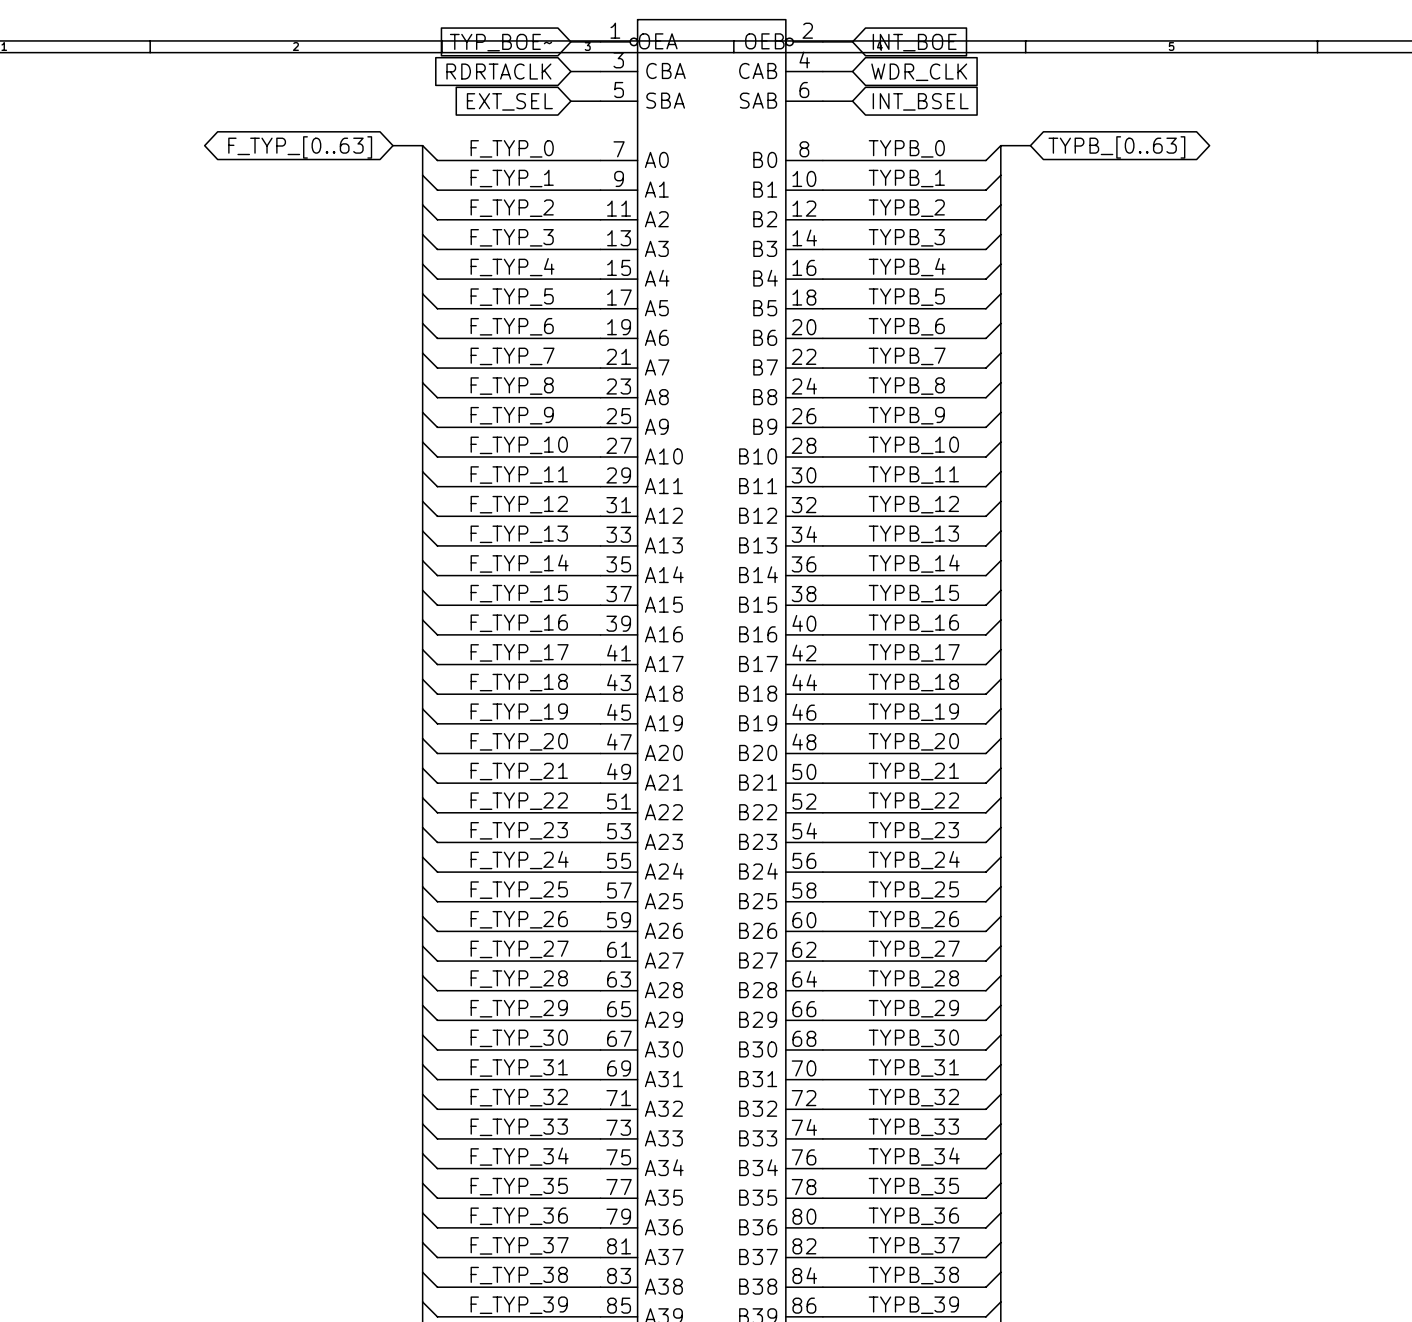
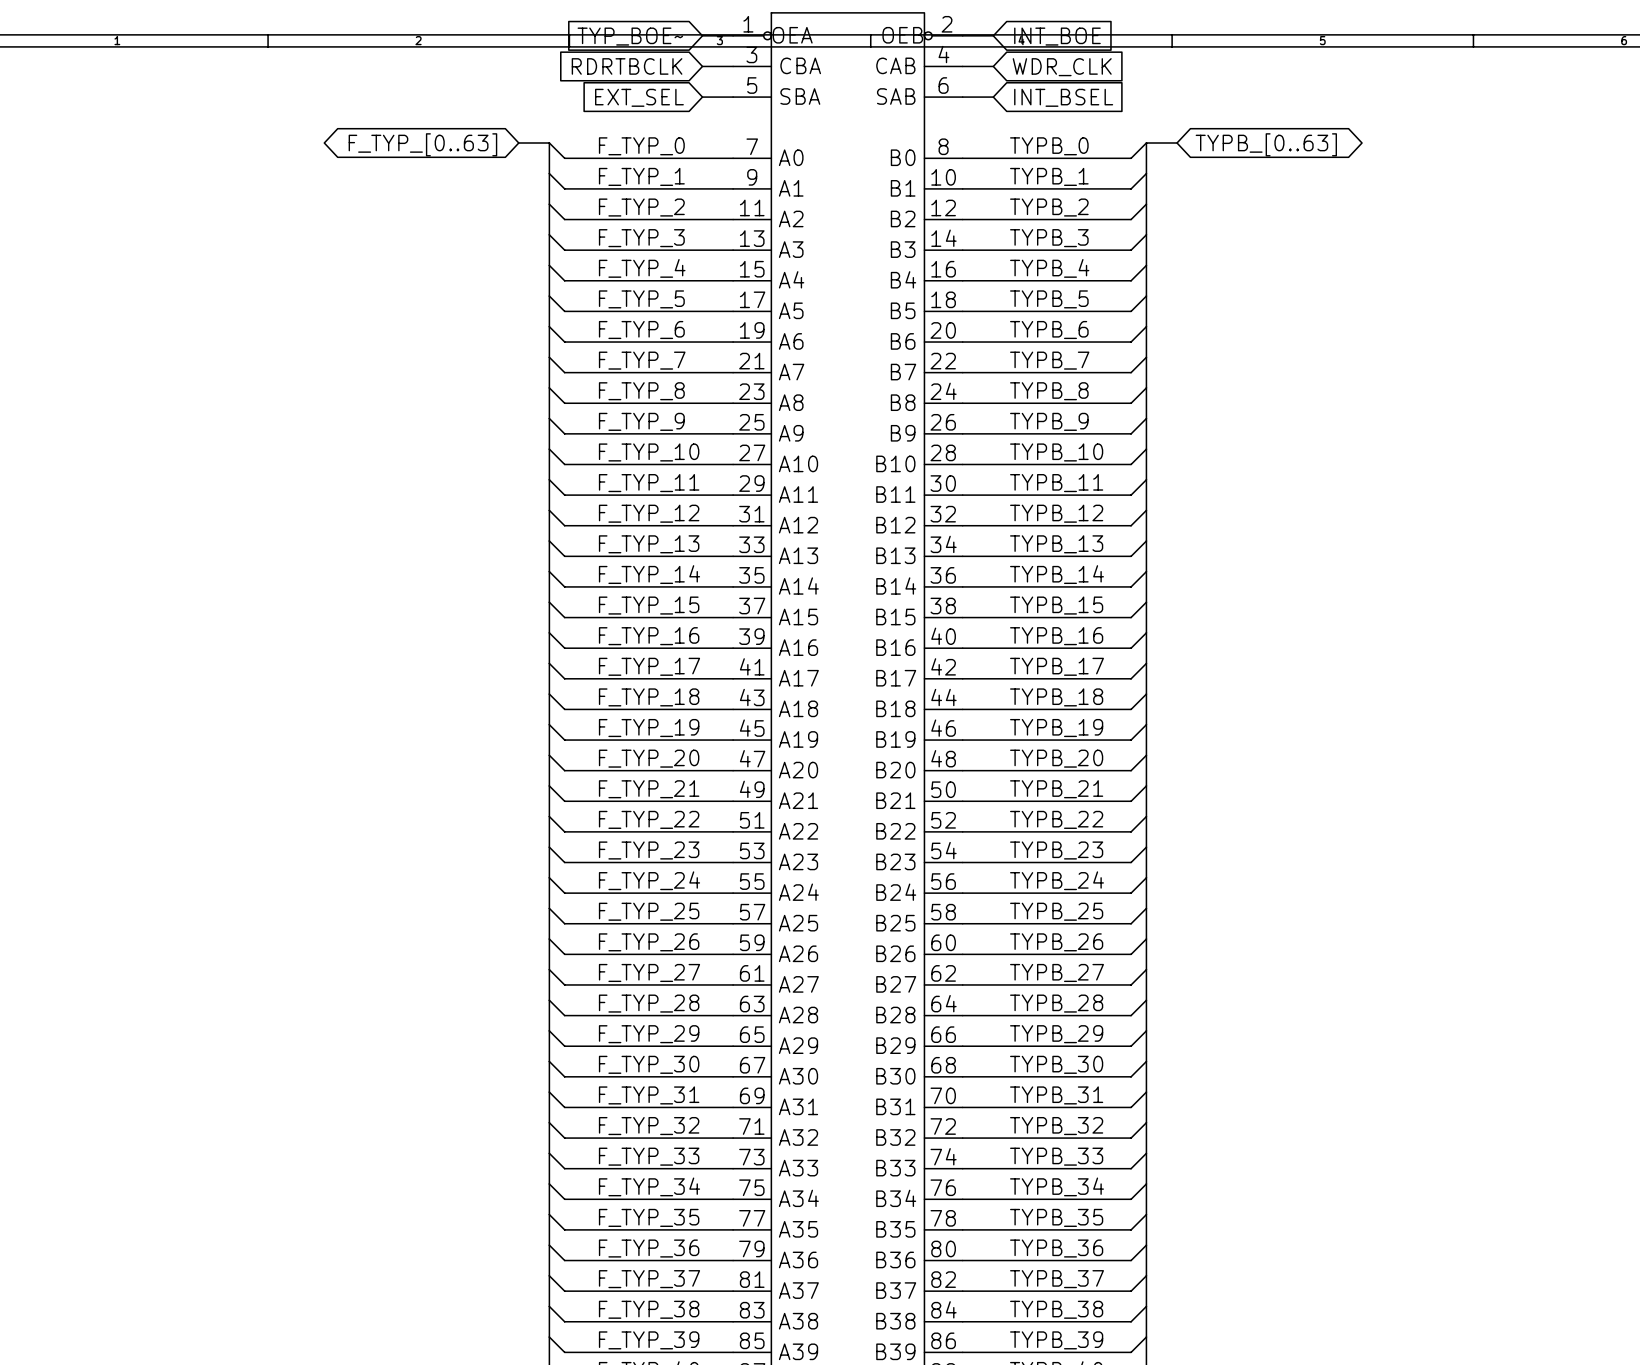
global label: RDRTACLK (498, 71) -> RDRTBCLK (627, 66)

